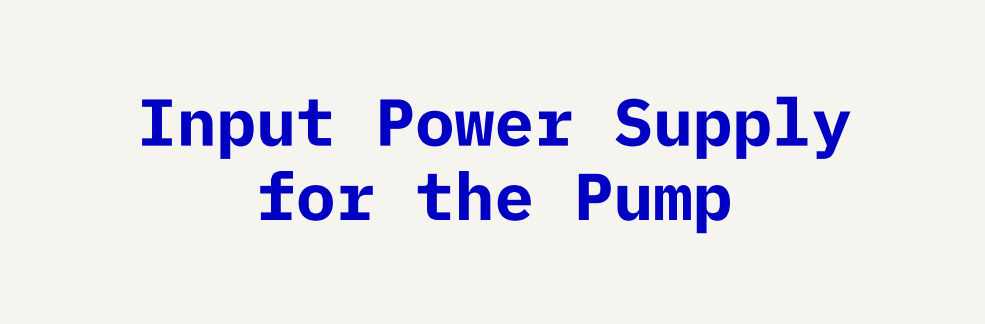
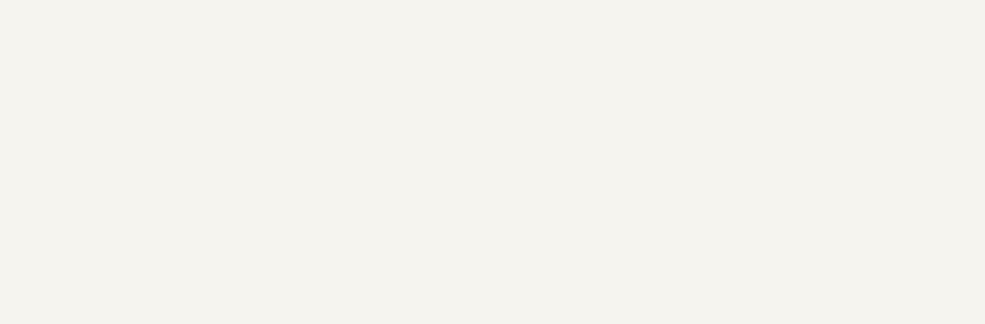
text: Input Power Supply (496, 127) -> none
text: for the Pump (495, 202) -> none

